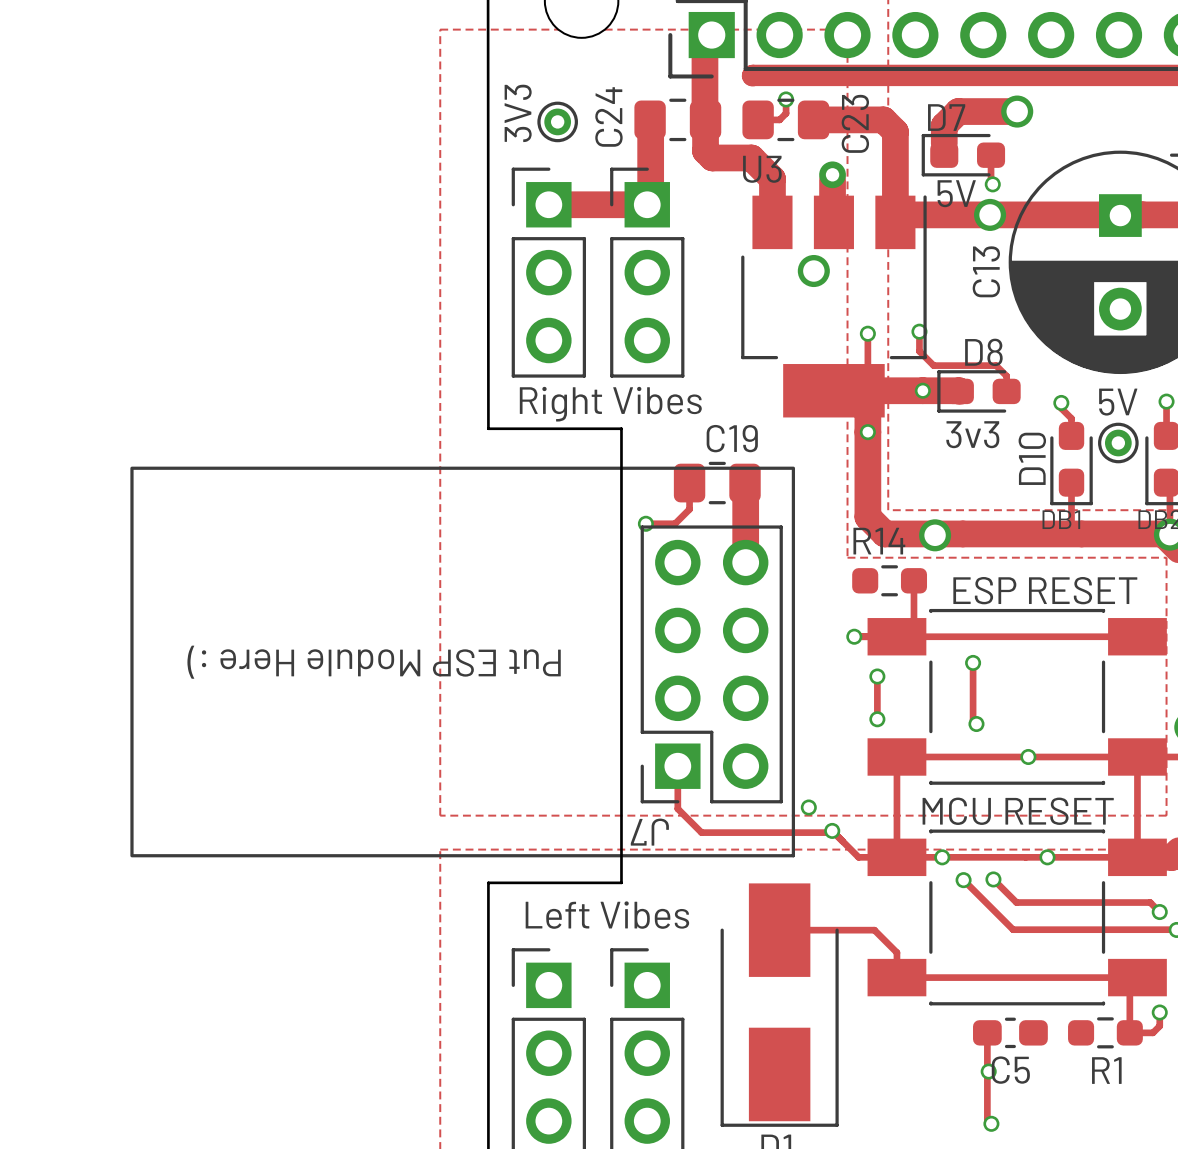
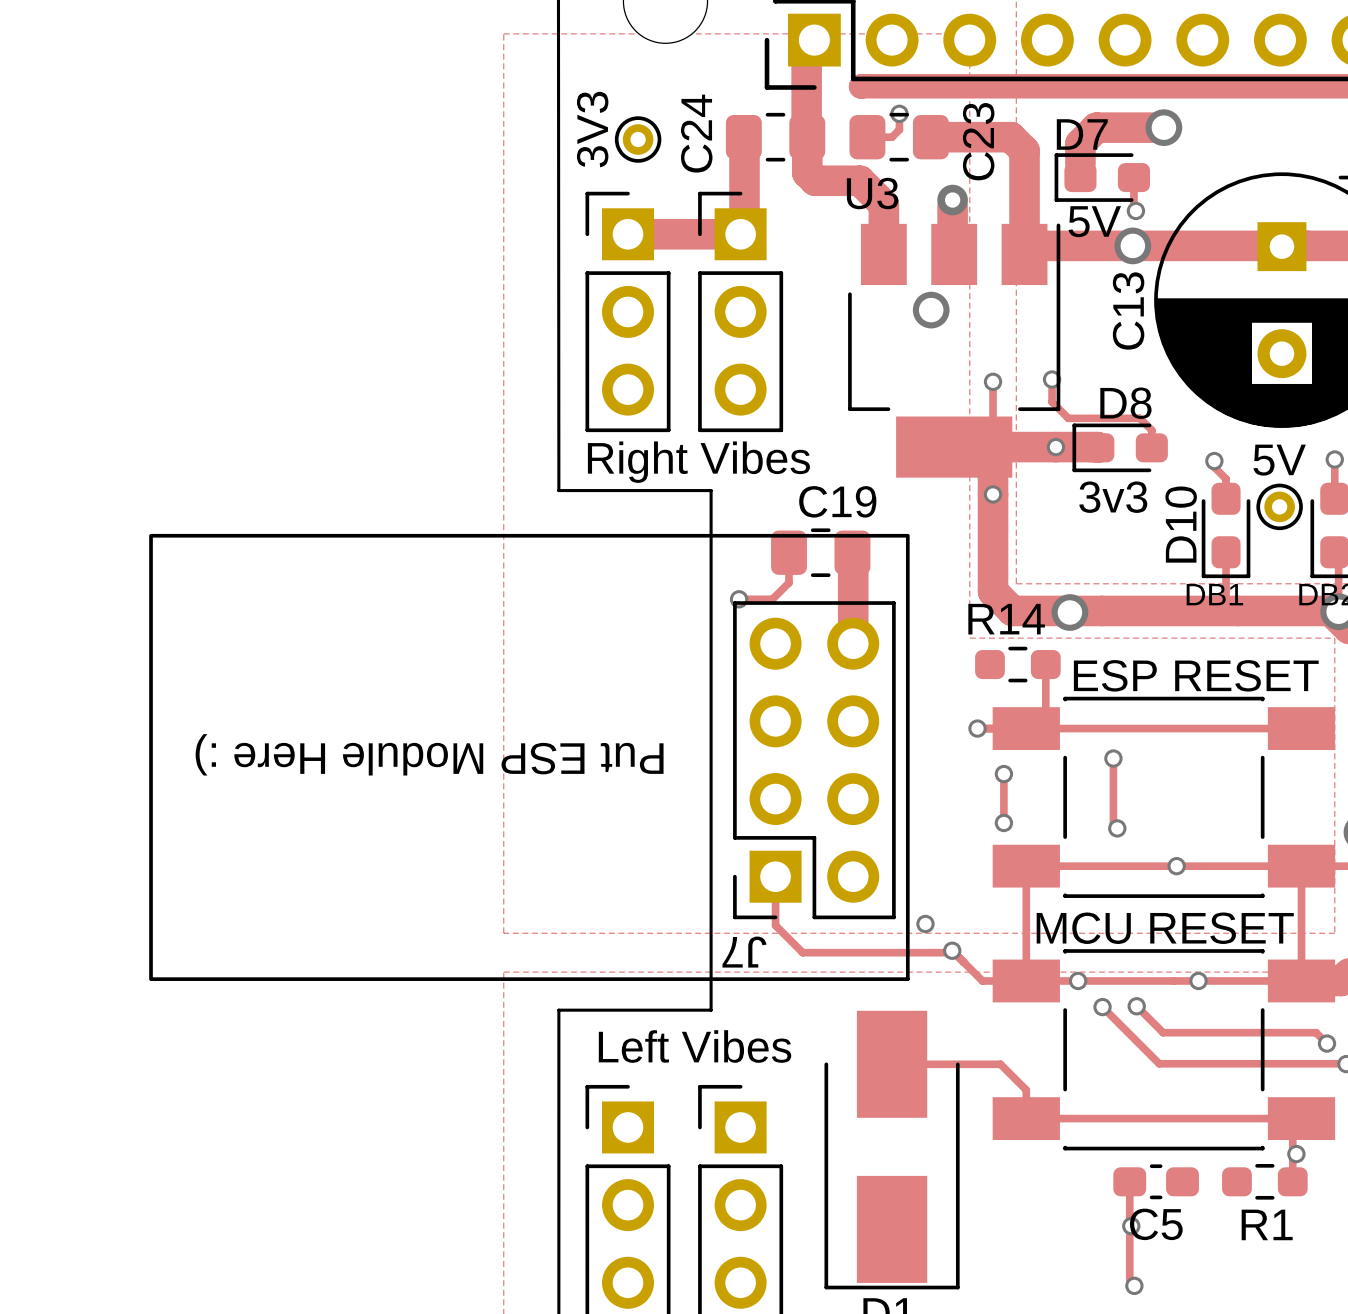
via: none -> (1296, 1154)
track: (1159, 1012) (1159, 1026) (1152, 1032) (1129, 1032) -> none
via: (1159, 1012) -> none

